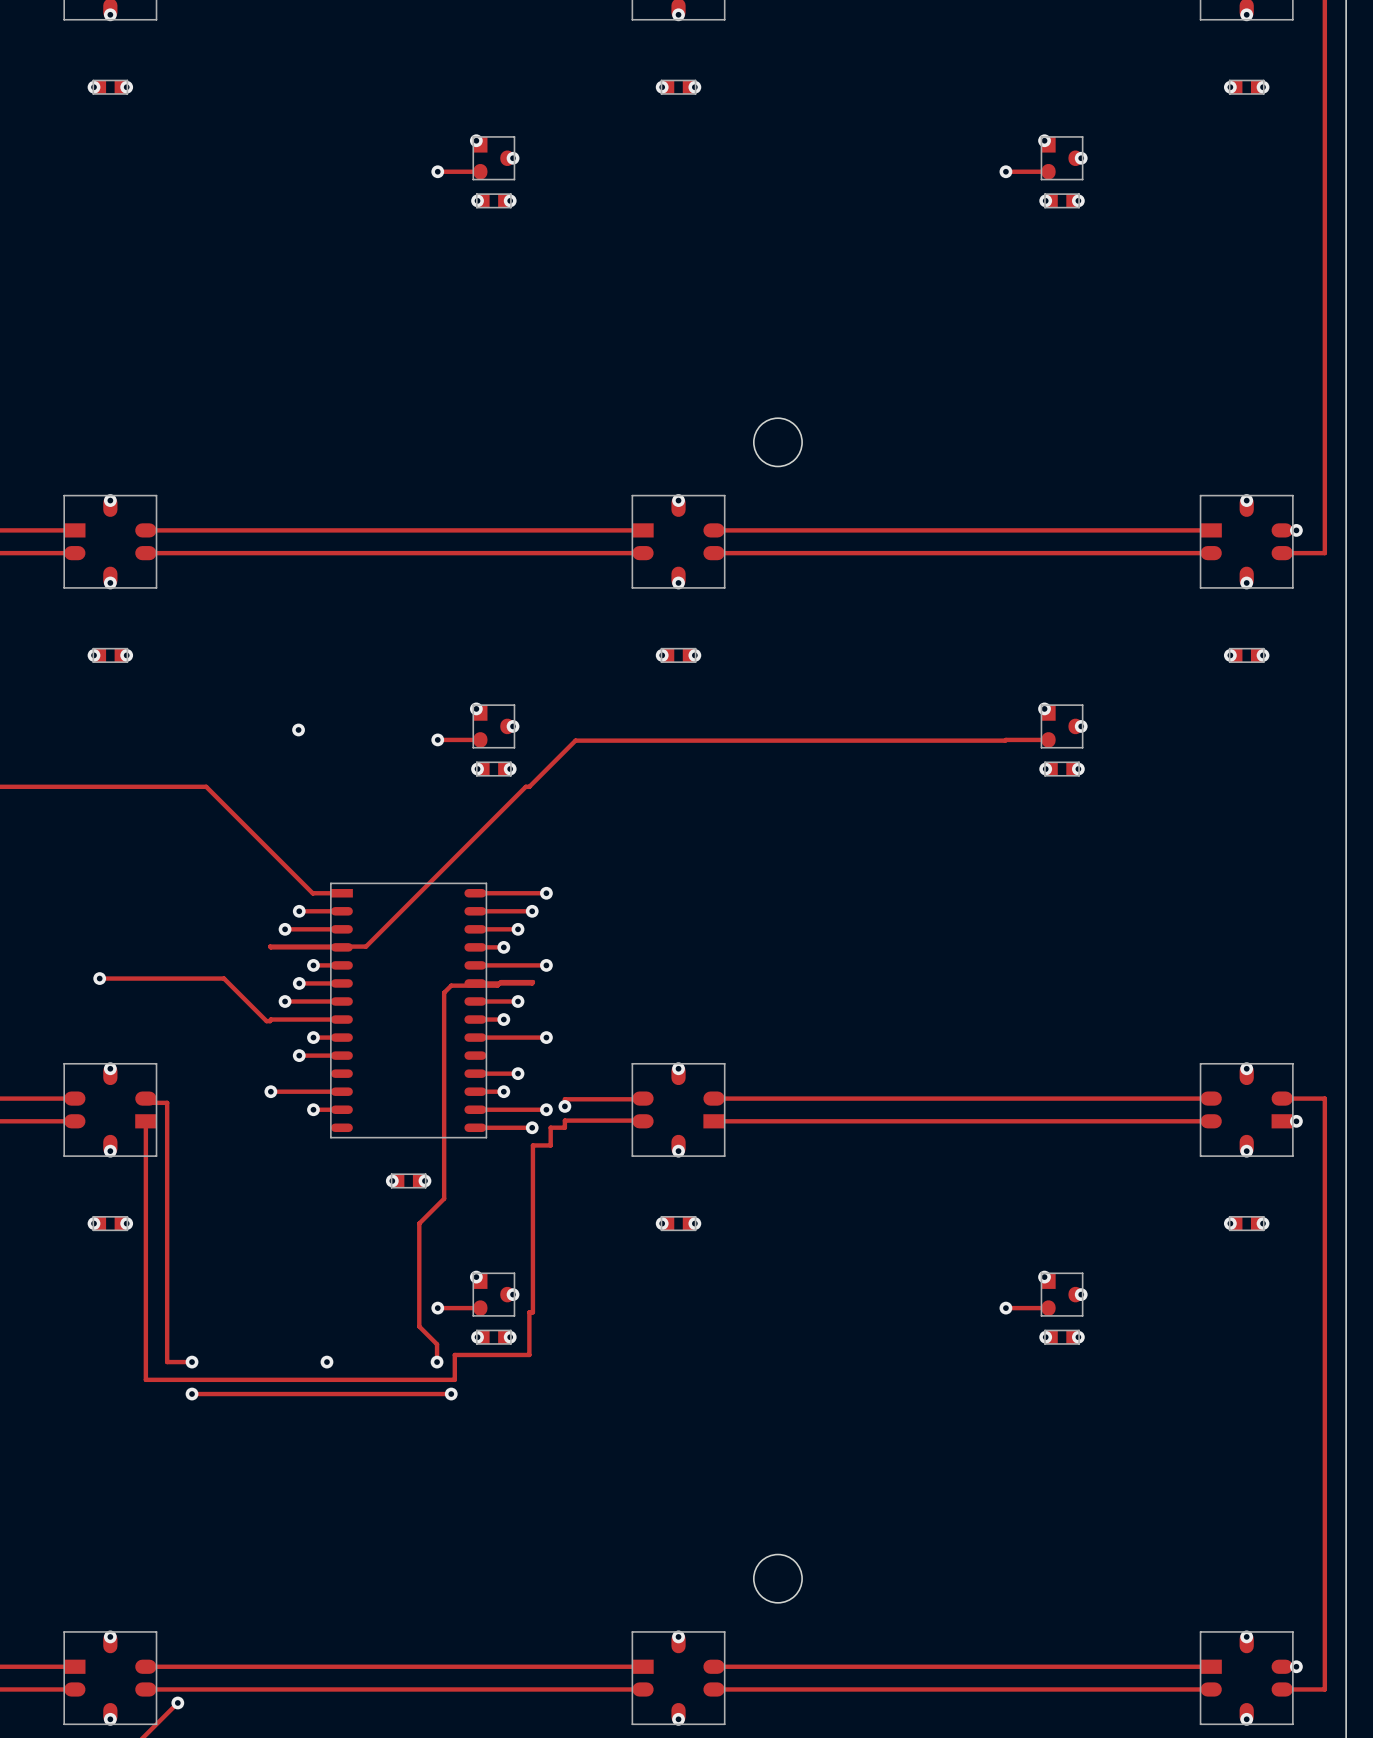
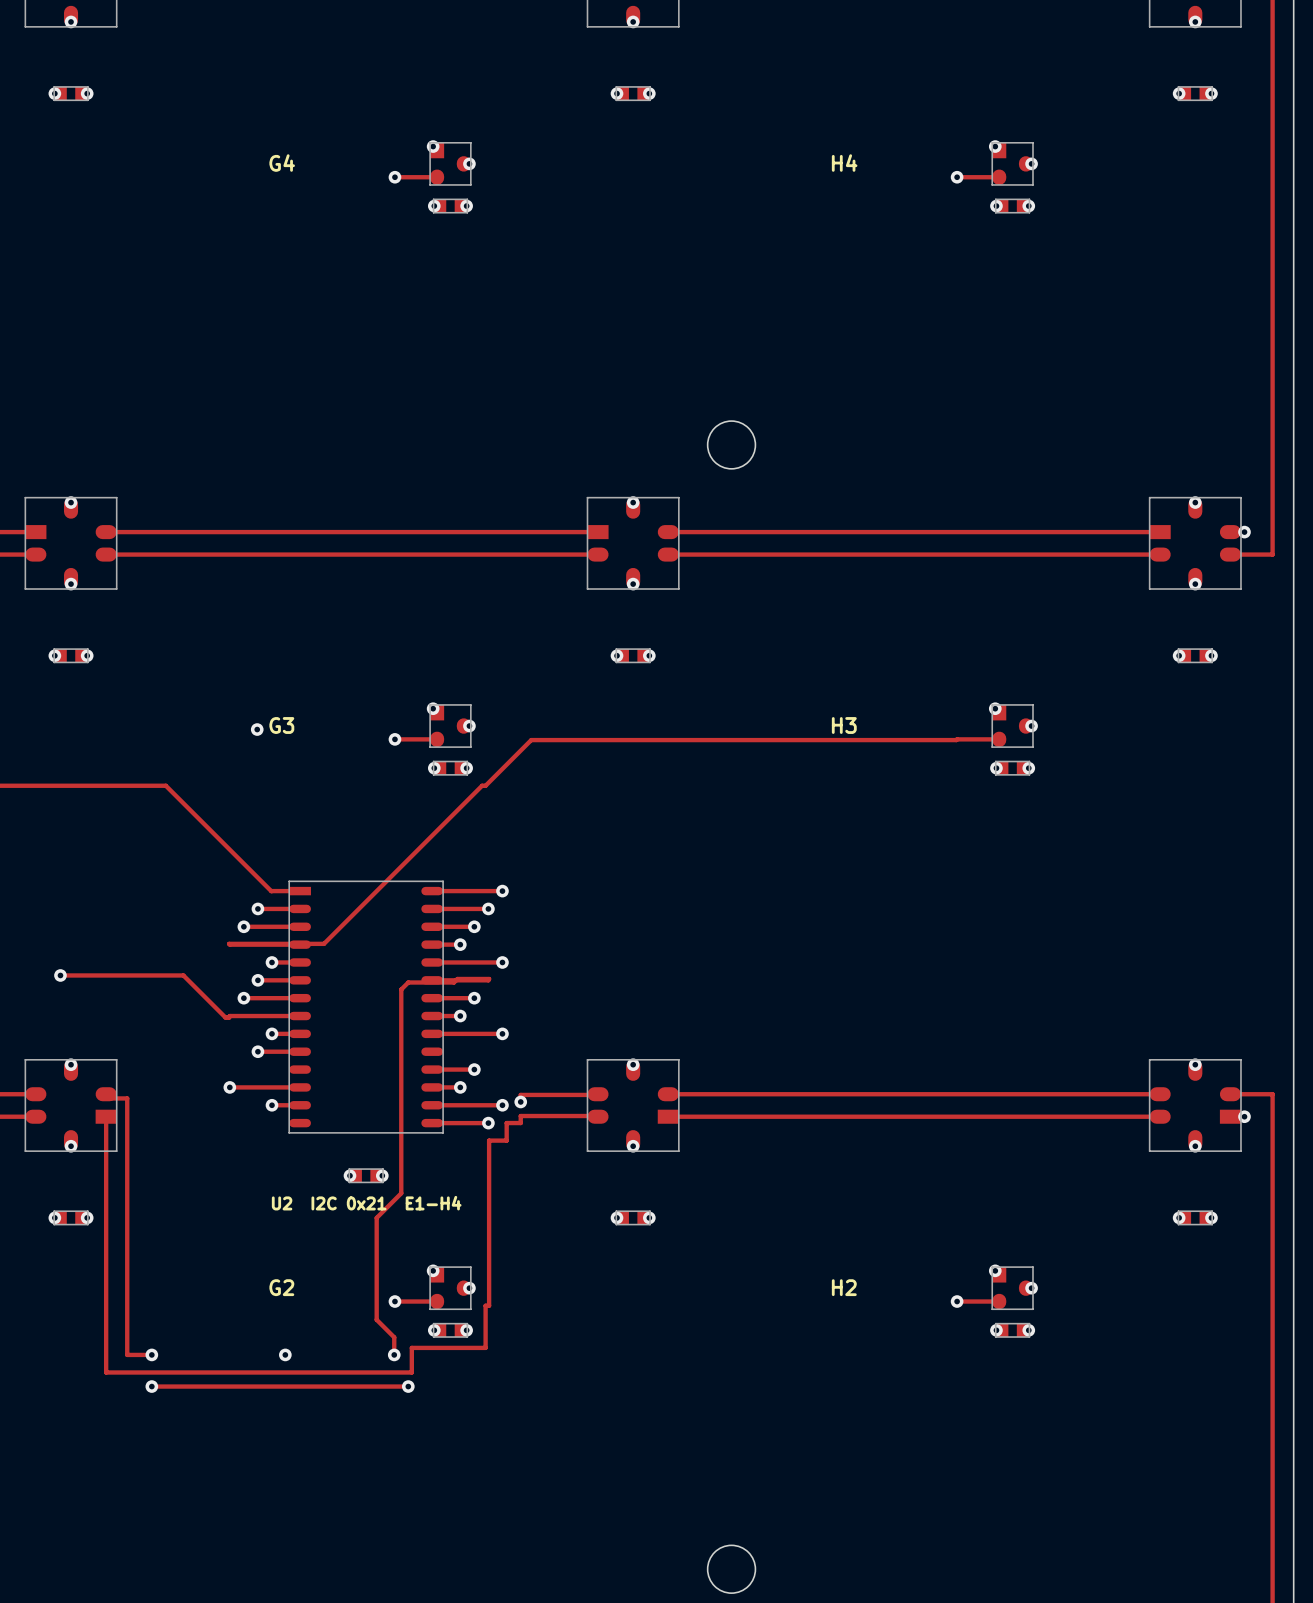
text: none -> G4 (282, 163)
text: none -> H4 (844, 163)
text: none -> G3 (281, 725)
text: none -> H3 (844, 725)
text: none -> U2 I2C 0x21 E1-H4 (366, 1203)
text: none -> G2 (281, 1287)
text: none -> H2 (844, 1287)

